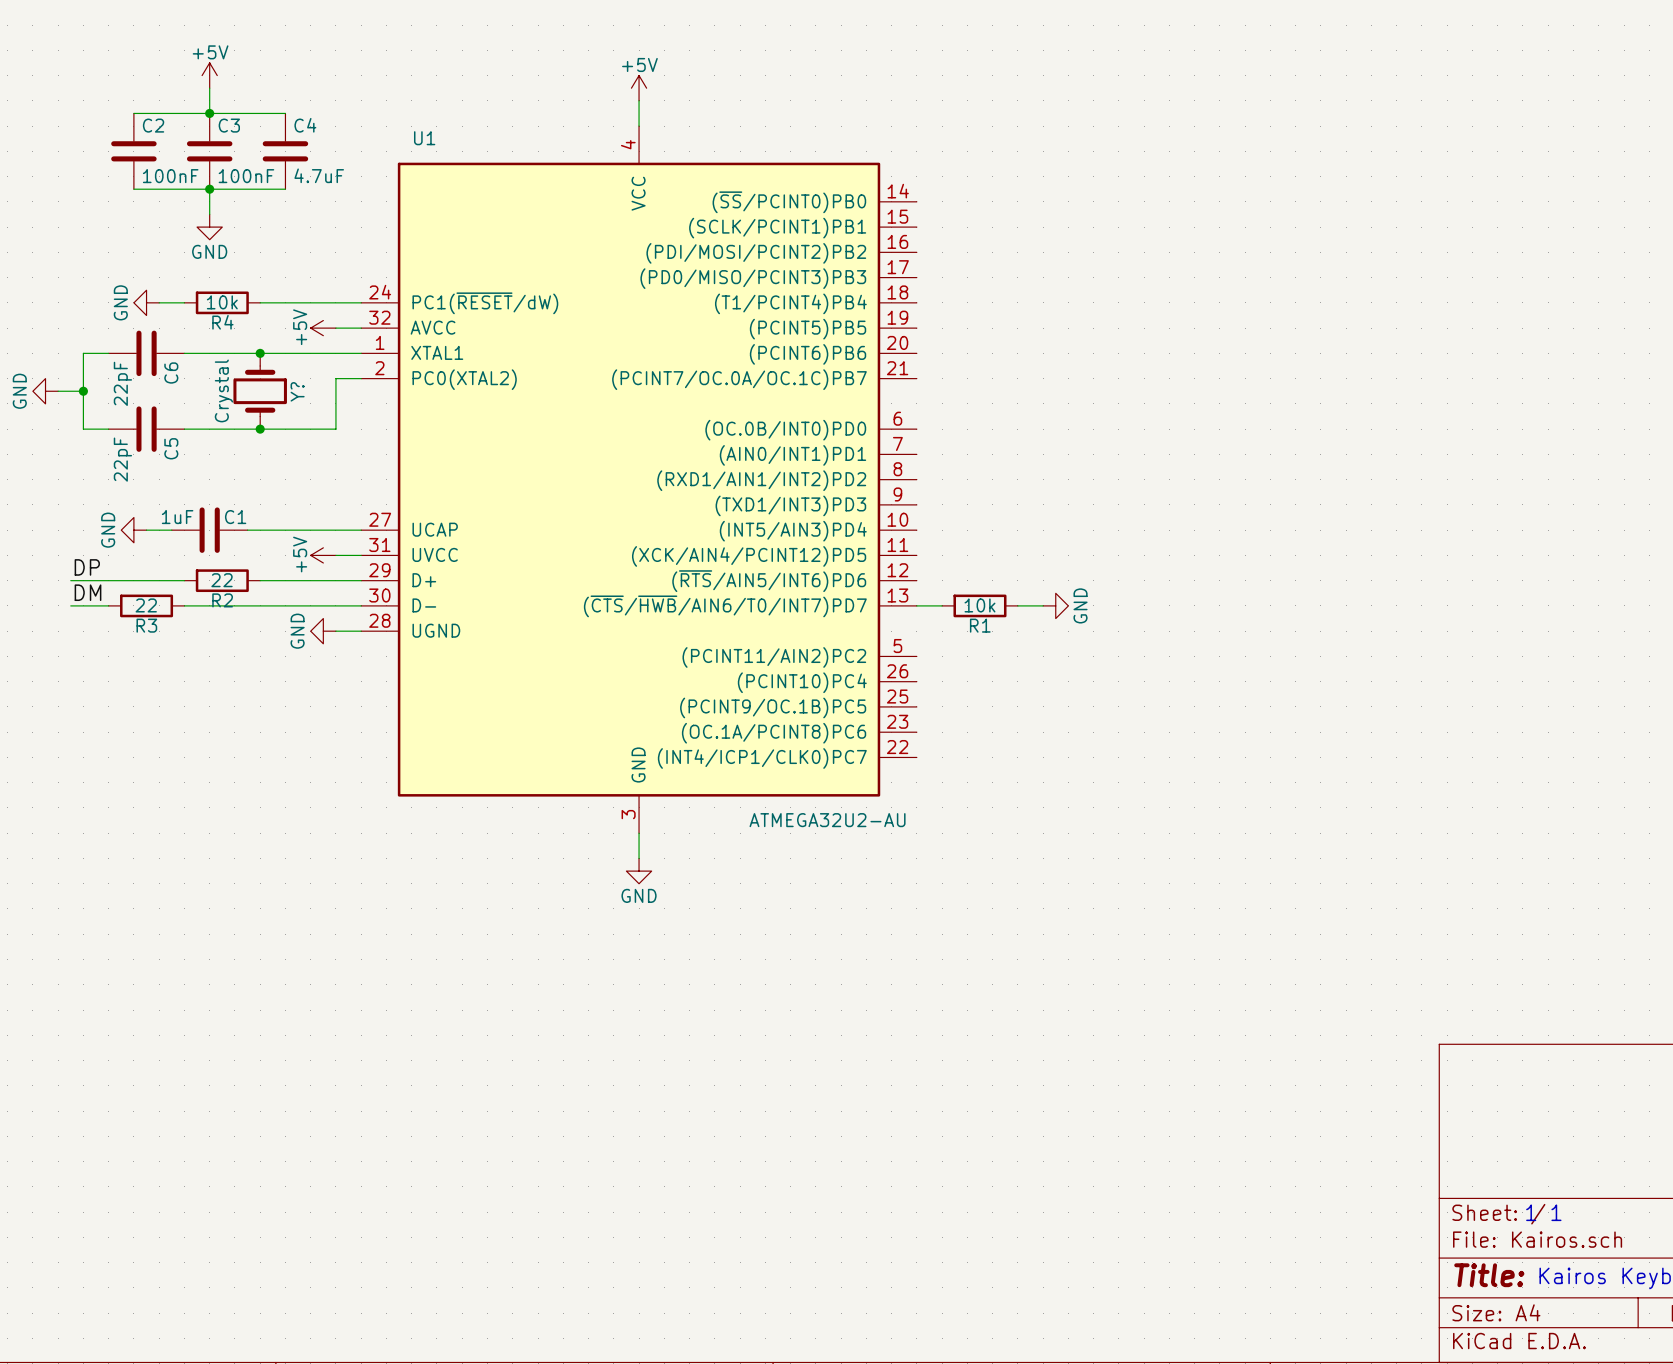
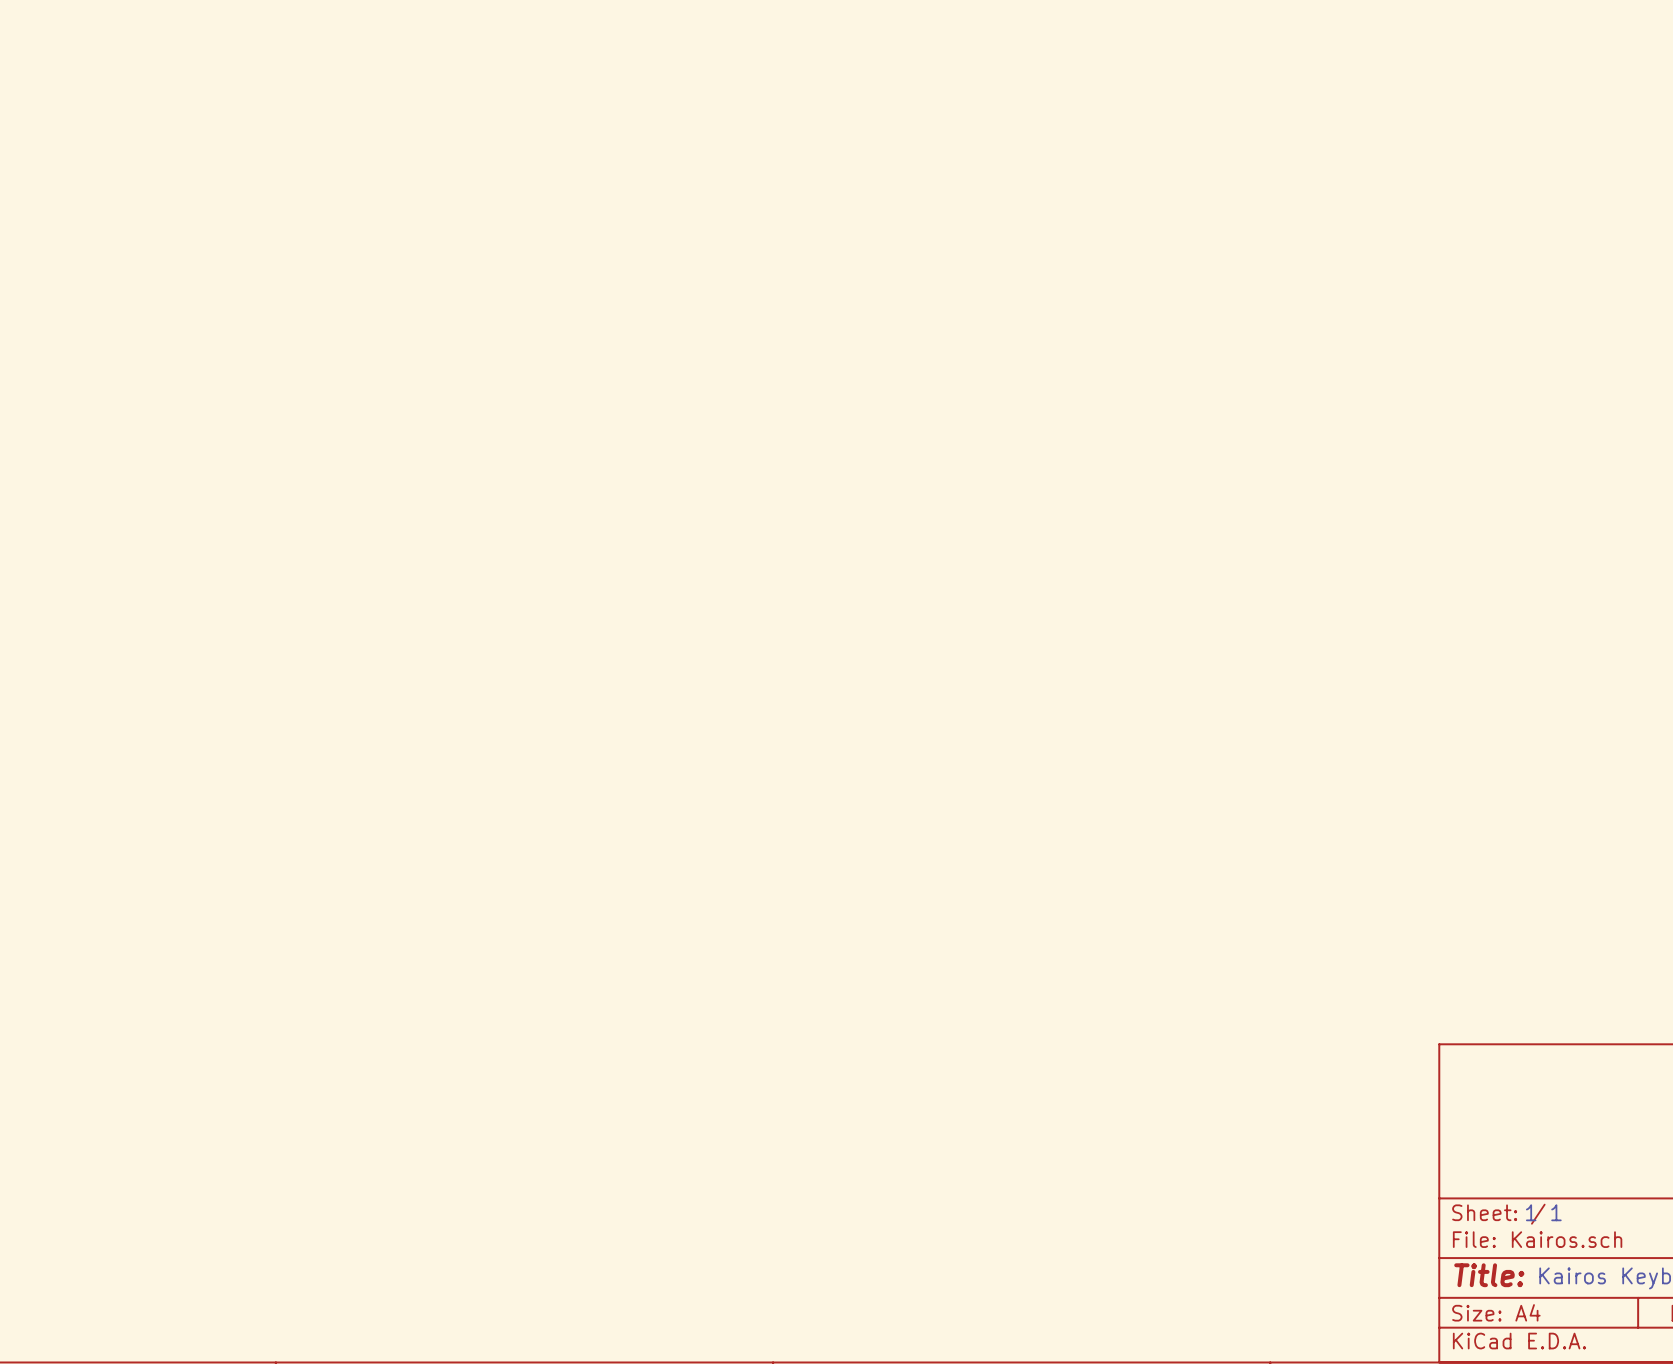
power symbol: +5V (209, 75) -> none
wire: (209, 88) (209, 113) -> none
power symbol: +5V (639, 88) -> none
wire: (639, 100) (639, 126) -> none
wire: (133, 113) (285, 113) -> none
junction: (209, 113) -> none
C2: 100nF (133, 151) -> none
C3: 100nF (209, 151) -> none
C4: 4.7uF (285, 151) -> none
wire: (133, 189) (285, 189) -> none
wire: (209, 189) (209, 214) -> none
junction: (209, 189) -> none
power symbol: GND (209, 227) -> none
power symbol: GND (146, 302) -> none
wire: (159, 302) (184, 302) -> none
R4: 10k (222, 302) -> none
wire: (260, 302) (361, 302) -> none
power symbol: +5V (323, 328) -> none
wire: (335, 328) (361, 328) -> none
wire: (108, 353) (83, 353) (83, 429) (108, 429) -> none
C6: 22pF (146, 353) -> none
wire: (184, 353) (361, 353) -> none
junction: (260, 353) -> none
wire: (361, 378) (335, 378) (335, 429) (184, 429) -> none
power symbol: GND (45, 391) -> none
wire: (58, 391) (83, 391) -> none
junction: (83, 391) -> none
Y?: Crystal (260, 391) -> none
C5: 22pF (146, 429) -> none
junction: (260, 429) -> none
U1: ATMEGA32U2-AU (639, 479) -> none
power symbol: GND (133, 530) -> none
wire: (146, 530) (171, 530) -> none
C1: 1uF (209, 530) -> none
wire: (247, 530) (361, 530) -> none
power symbol: +5V (323, 555) -> none
wire: (335, 555) (361, 555) -> none
label: DP (87, 567) -> none
wire: (70, 580) (184, 580) -> none
R2: 22 (222, 580) -> none
wire: (260, 580) (361, 580) -> none
label: DM (88, 592) -> none
wire: (70, 605) (108, 605) -> none
R3: 22 (146, 605) -> none
wire: (184, 605) (361, 605) -> none
wire: (916, 605) (942, 605) -> none
R1: 10k (979, 605) -> none
wire: (1017, 605) (1043, 605) -> none
power symbol: GND (1055, 605) -> none
power symbol: GND (323, 631) -> none
wire: (335, 631) (361, 631) -> none
wire: (639, 833) (639, 858) -> none
power symbol: GND (639, 871) -> none

